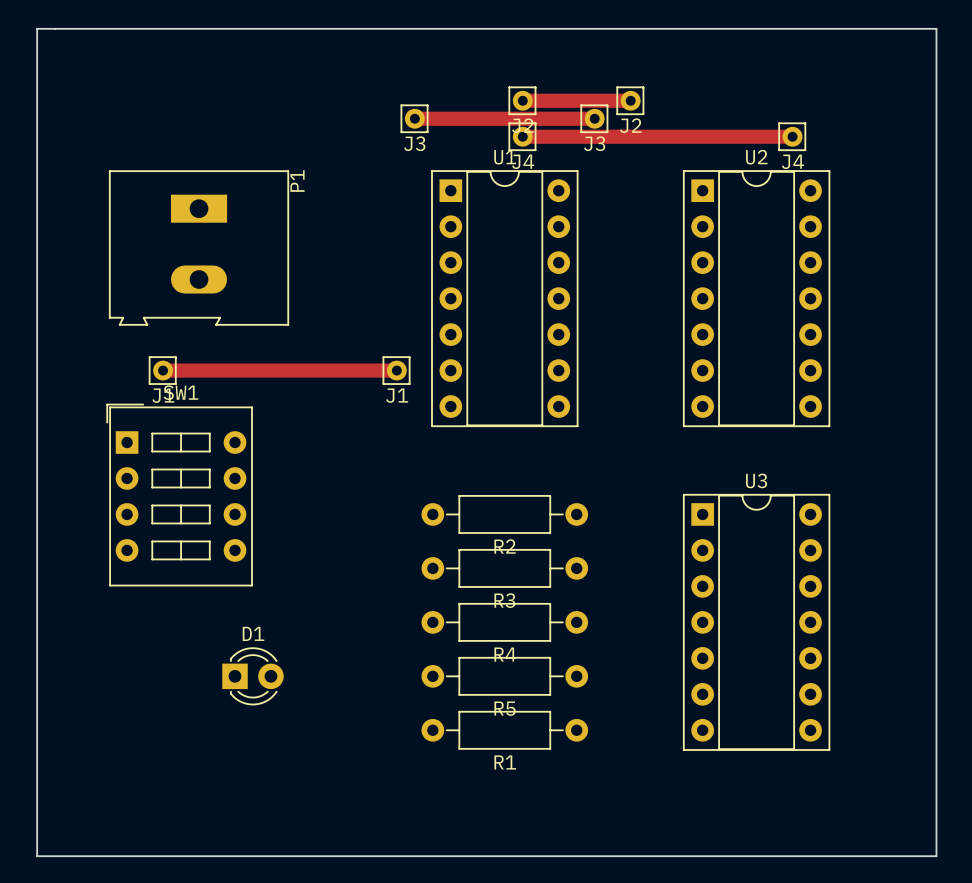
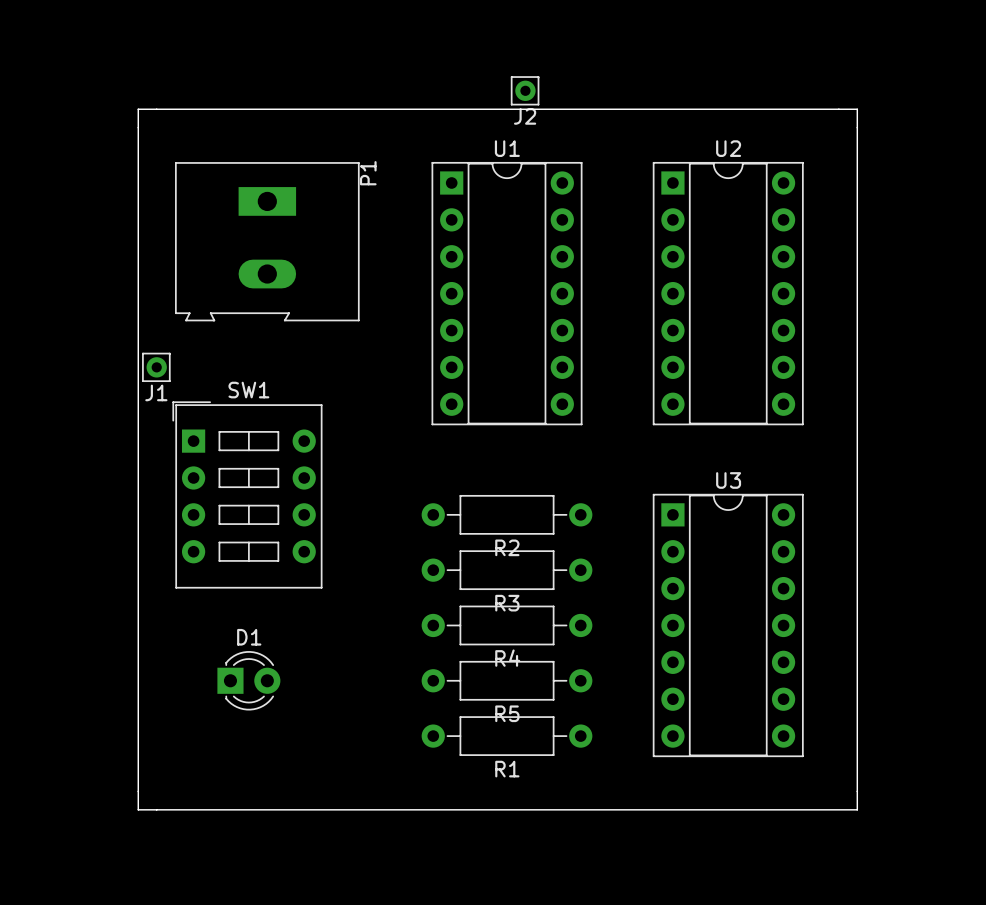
board edge: (37, 28) (936, 28) (936, 856) (37, 856) (37, 28) -> (138, 109) (138, 809) (857, 809) (857, 109) (138, 109)
track: (522, 100) (630, 100) -> none
J2: (630, 100) -> none
track: (414, 118) (594, 118) -> none
J3: (414, 118) -> none
J3: (594, 118) -> none
track: (522, 136) (792, 136) -> none
J4: (522, 136) -> none
J4: (792, 136) -> none
P1 position: (199, 247) -> (267, 241)
U2 position: (756, 298) -> (728, 293)
track: (163, 370) (396, 370) -> none
J1: (396, 370) -> none
SW1 position: (179, 495) -> (247, 494)
U3 position: (756, 622) -> (728, 625)

